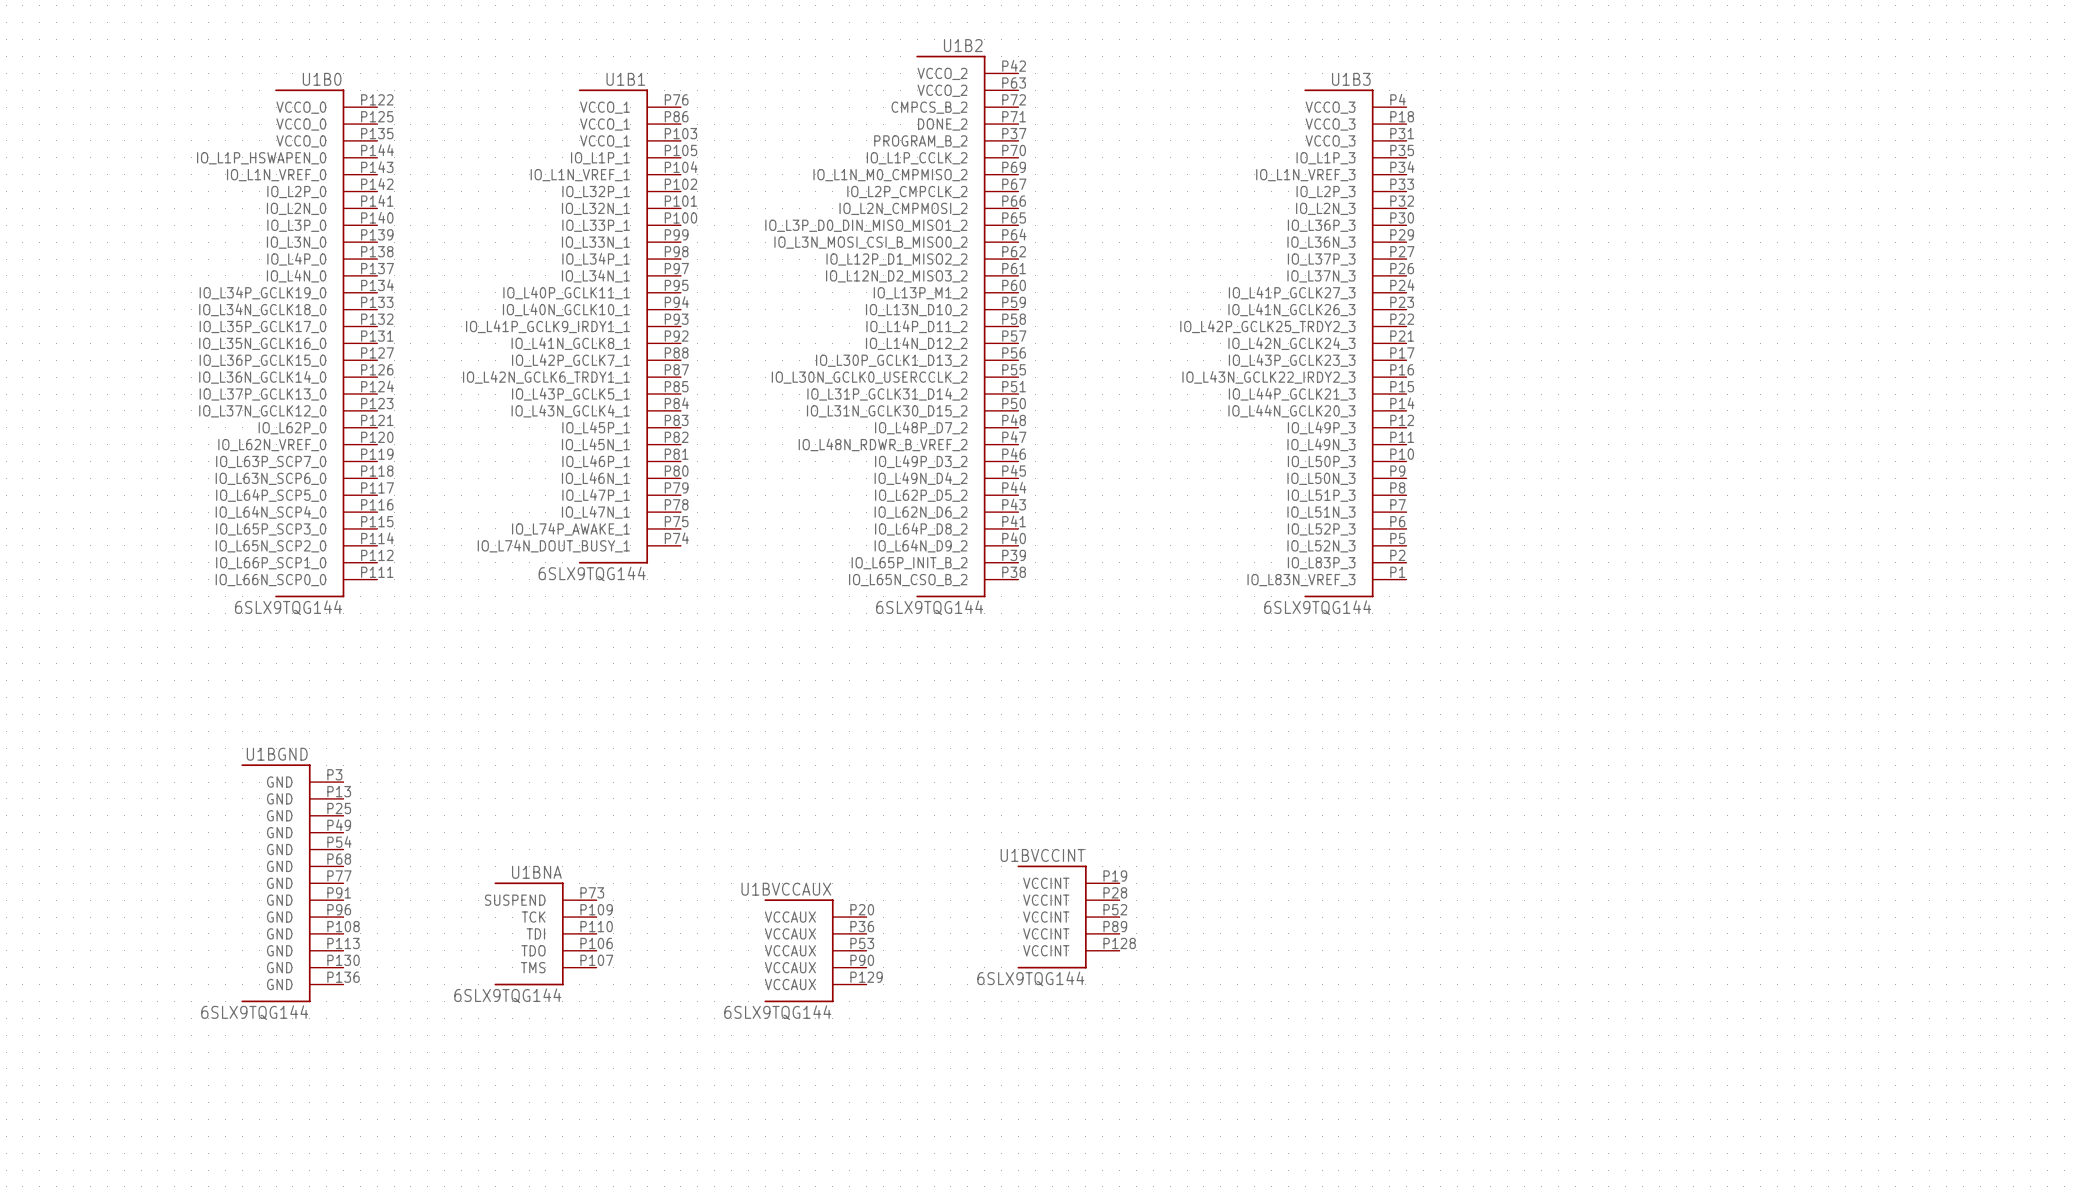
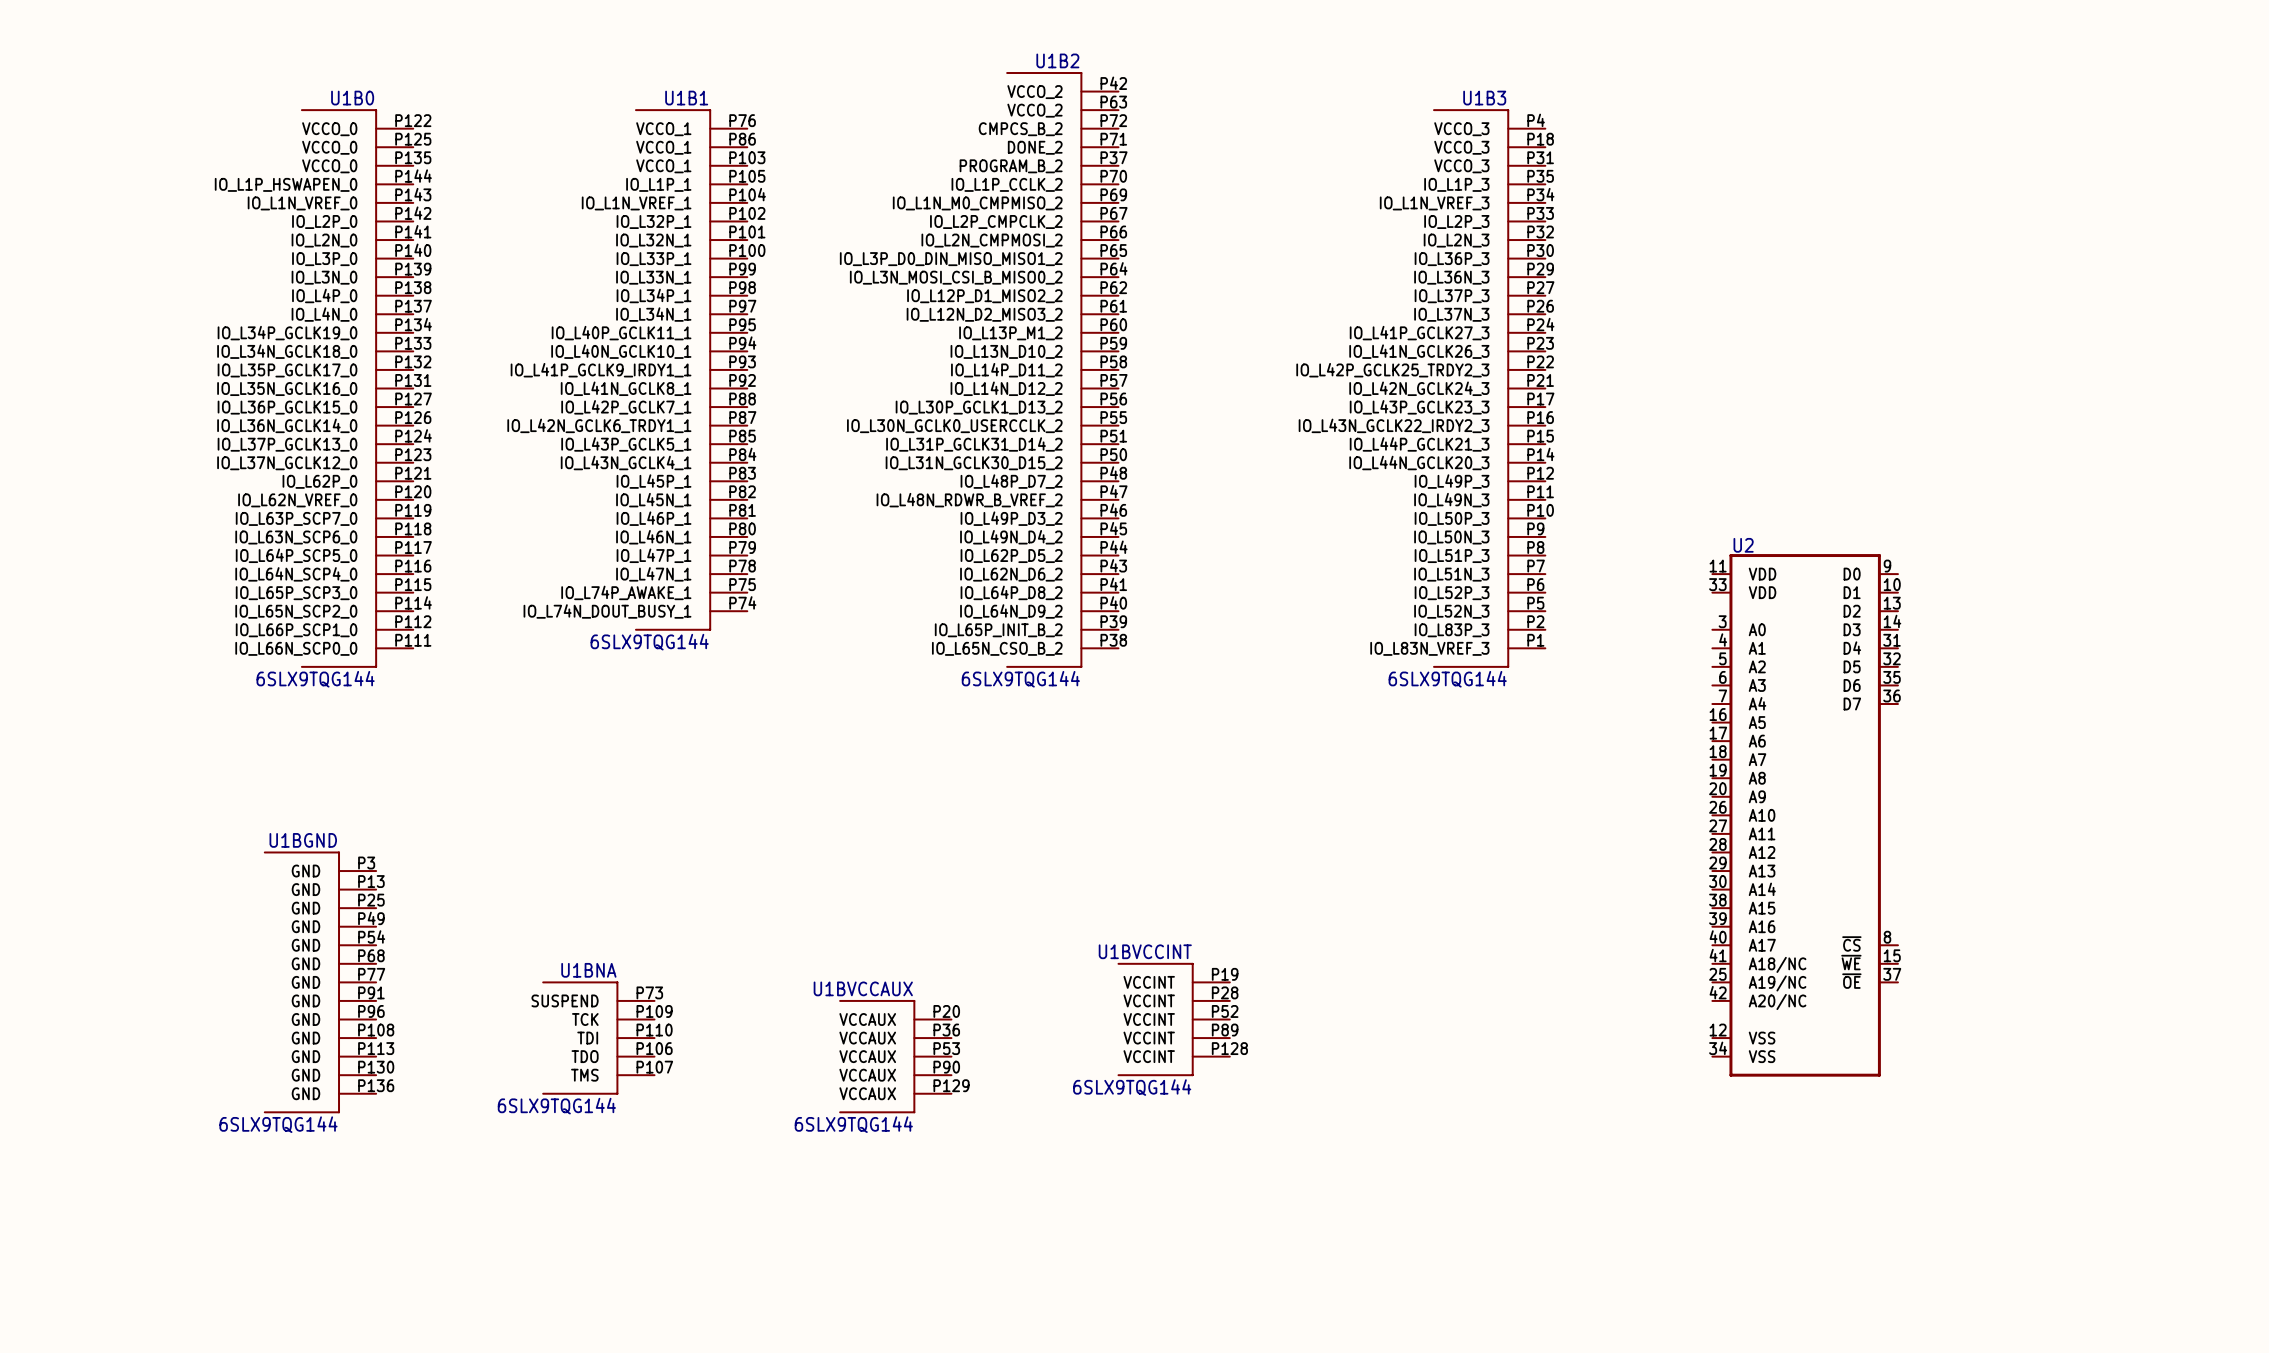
U2: none -> (1805, 815)

